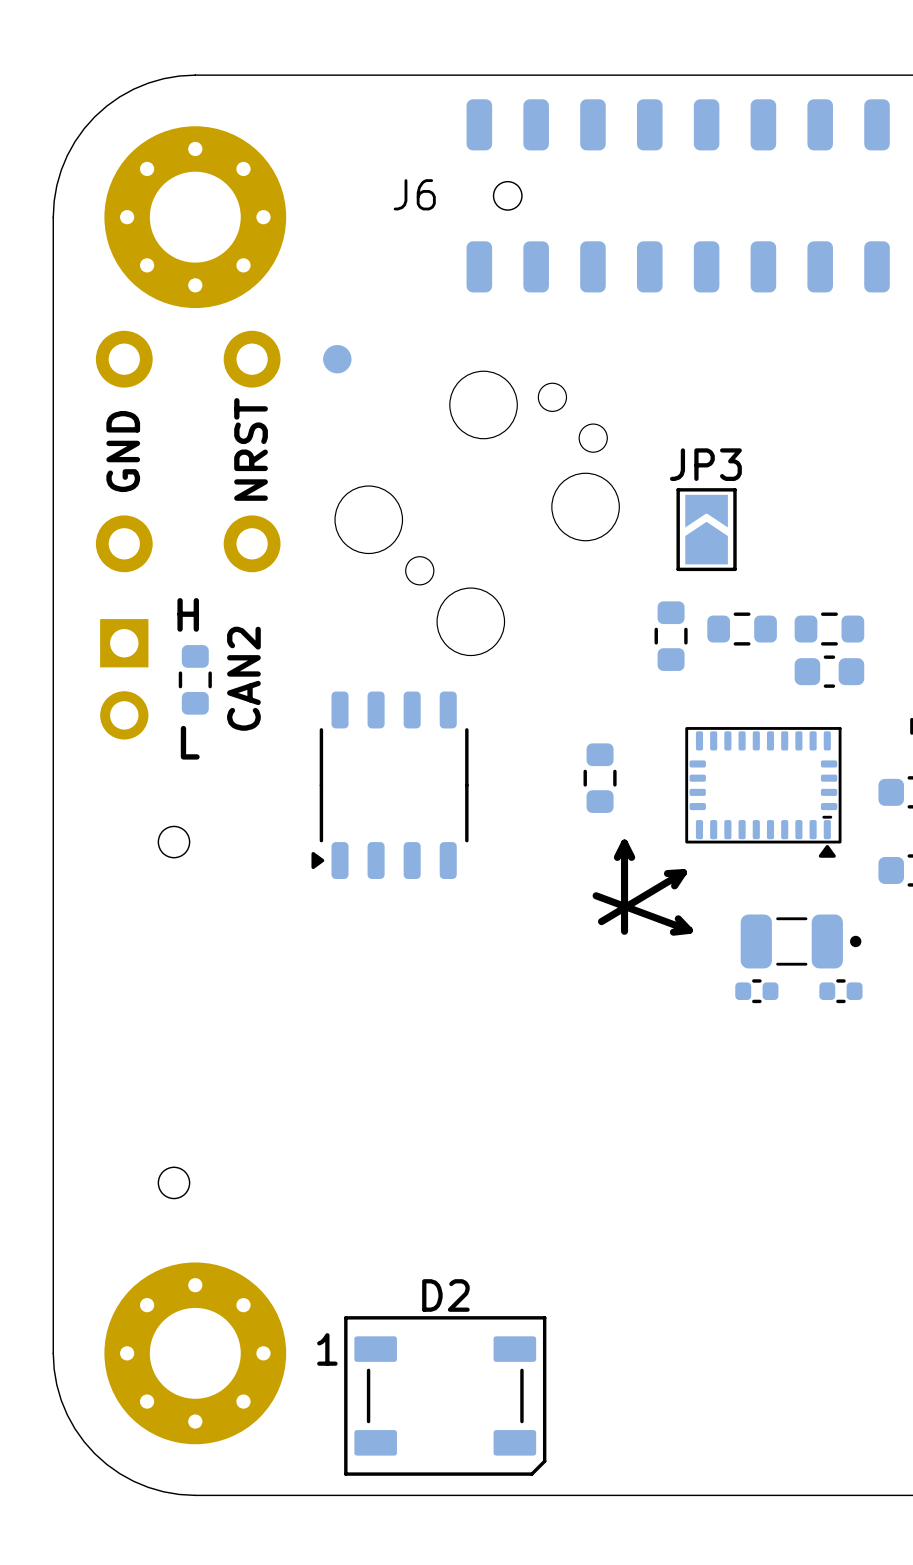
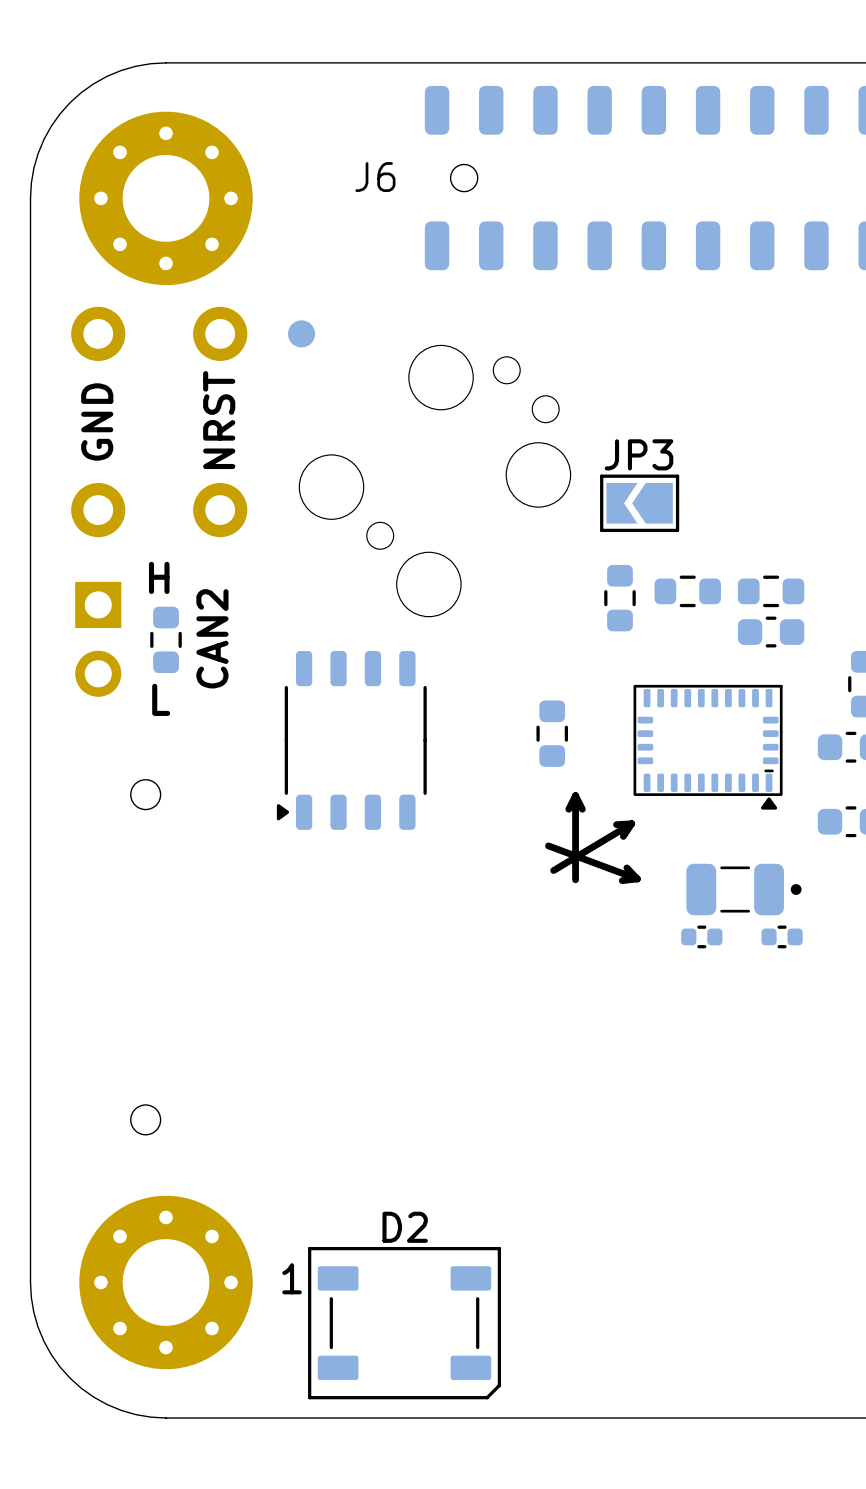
JP3 rotation: 0° (706, 529) -> 90° counterclockwise (639, 503)

